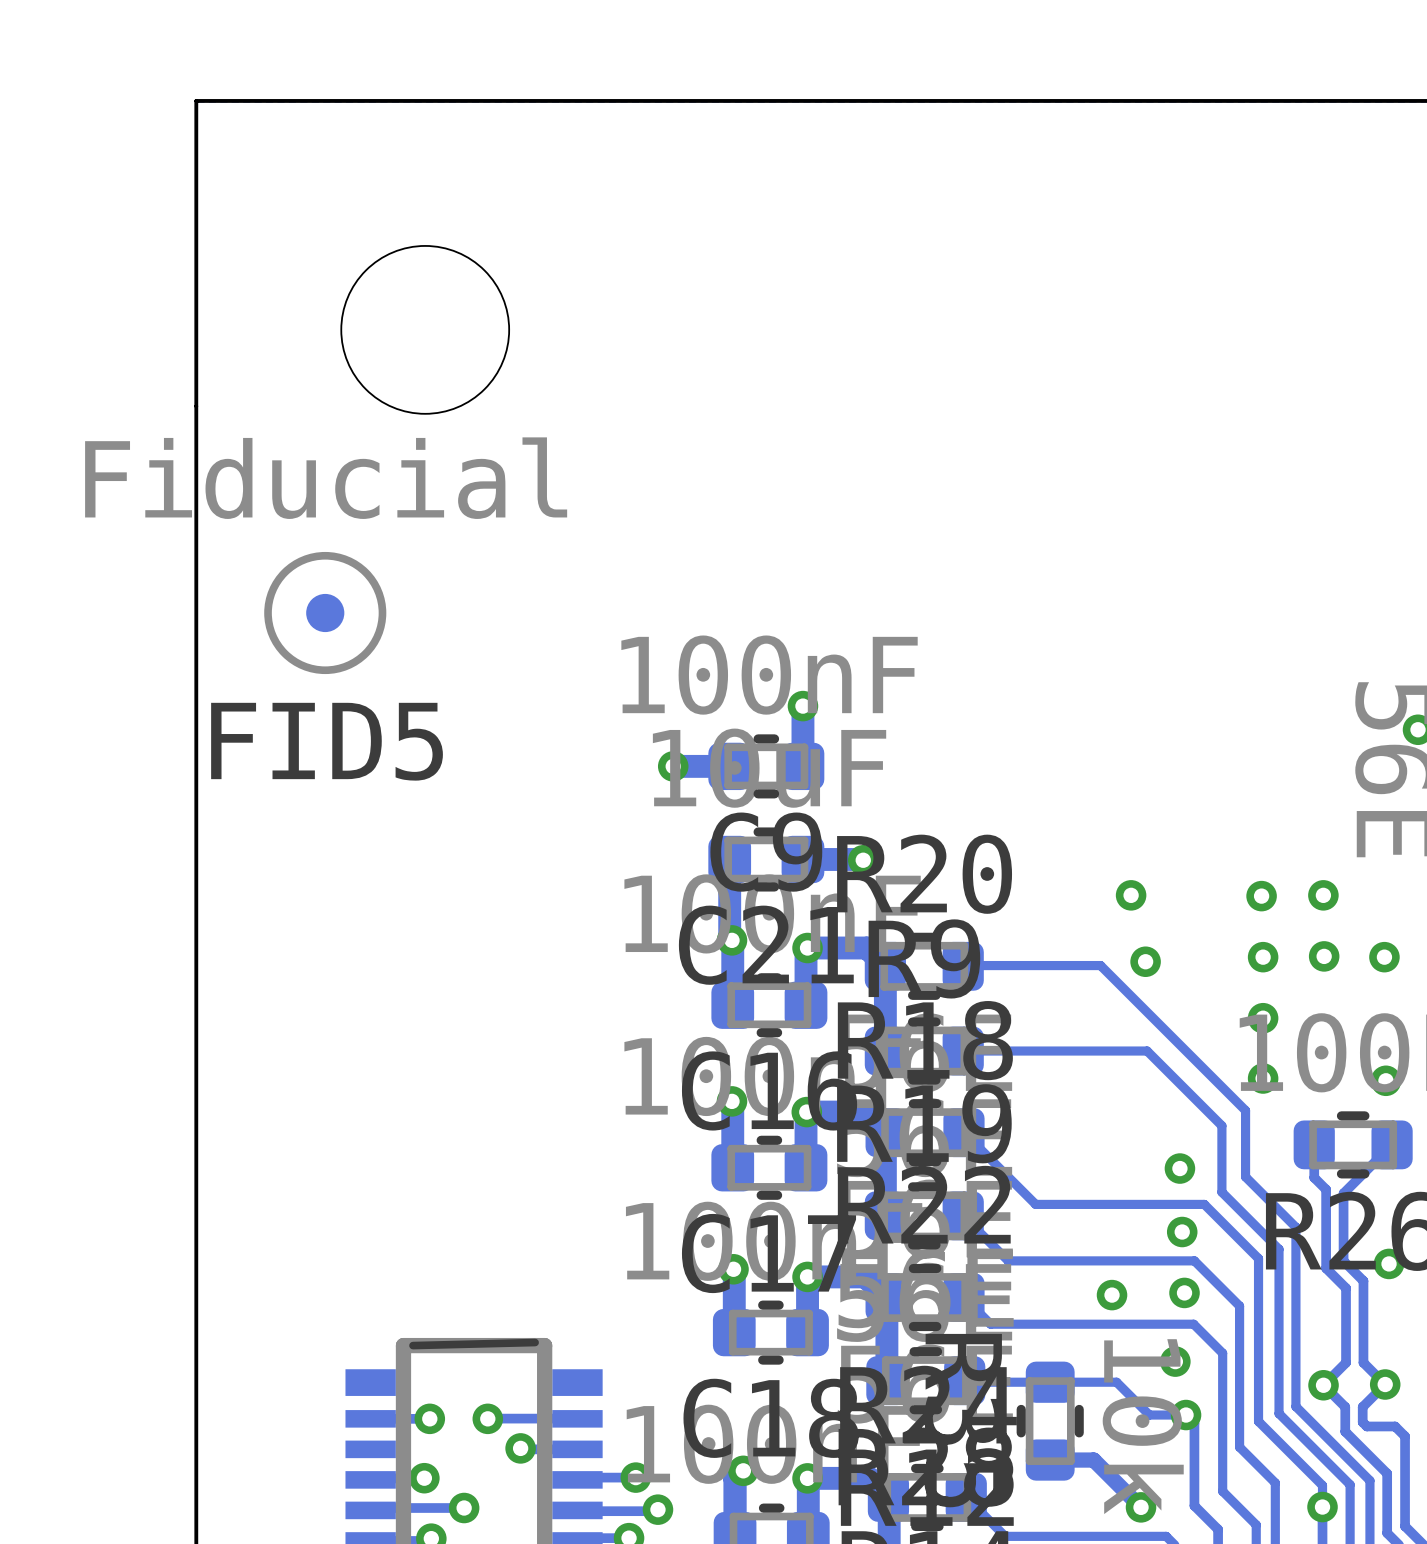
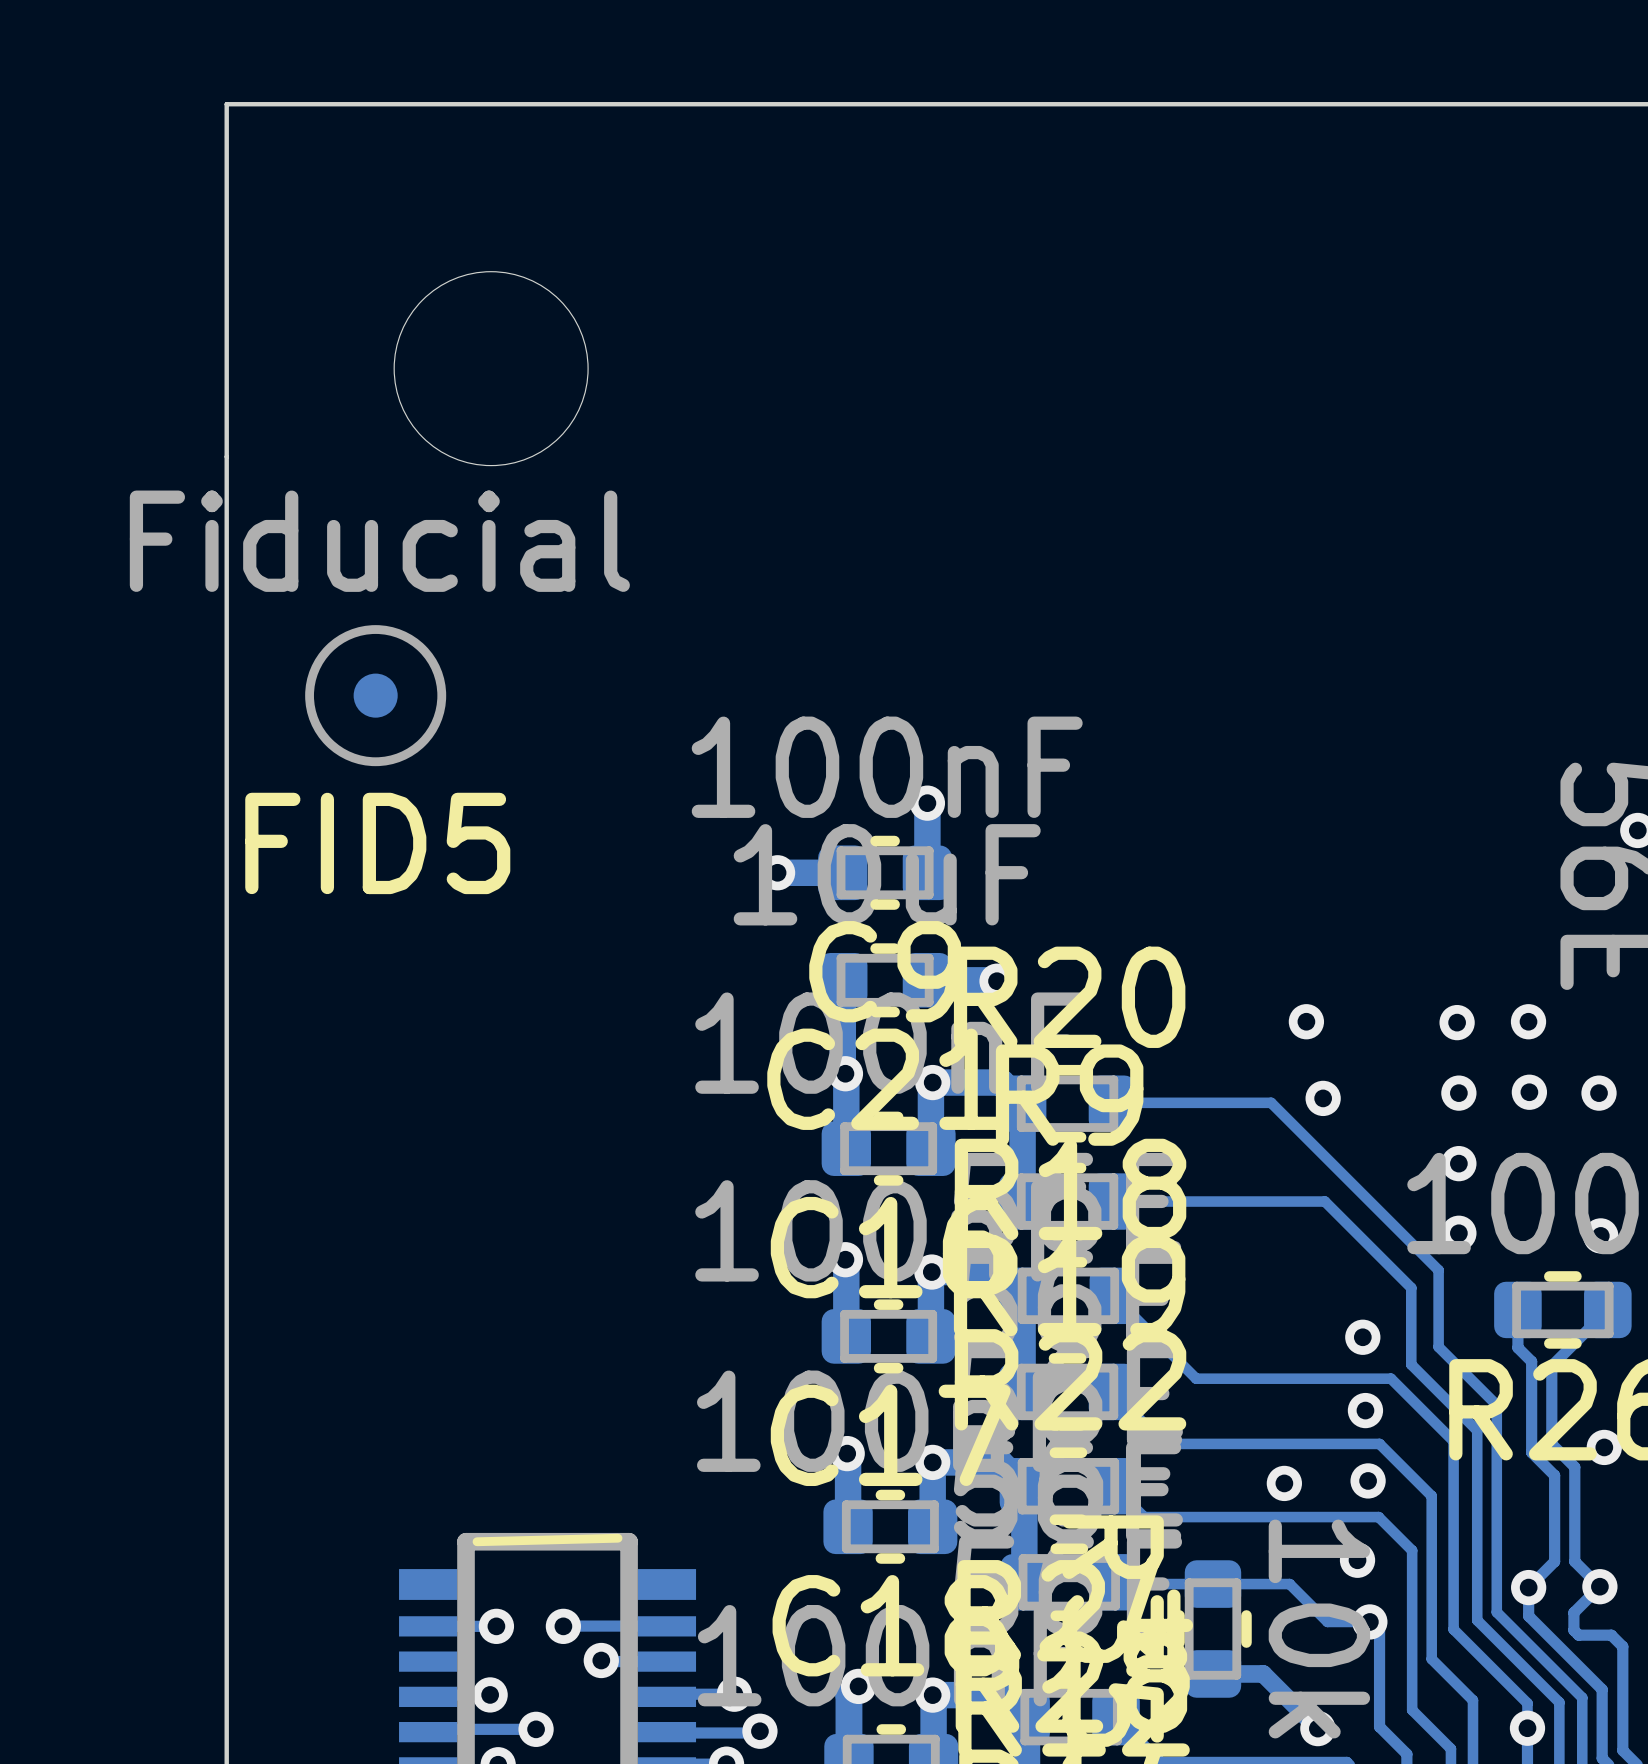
track: (1323, 1385) (1345, 1407) (1345, 1431) -> (1538, 1587) (1528, 1587) (1528, 1616) (1553, 1641)

